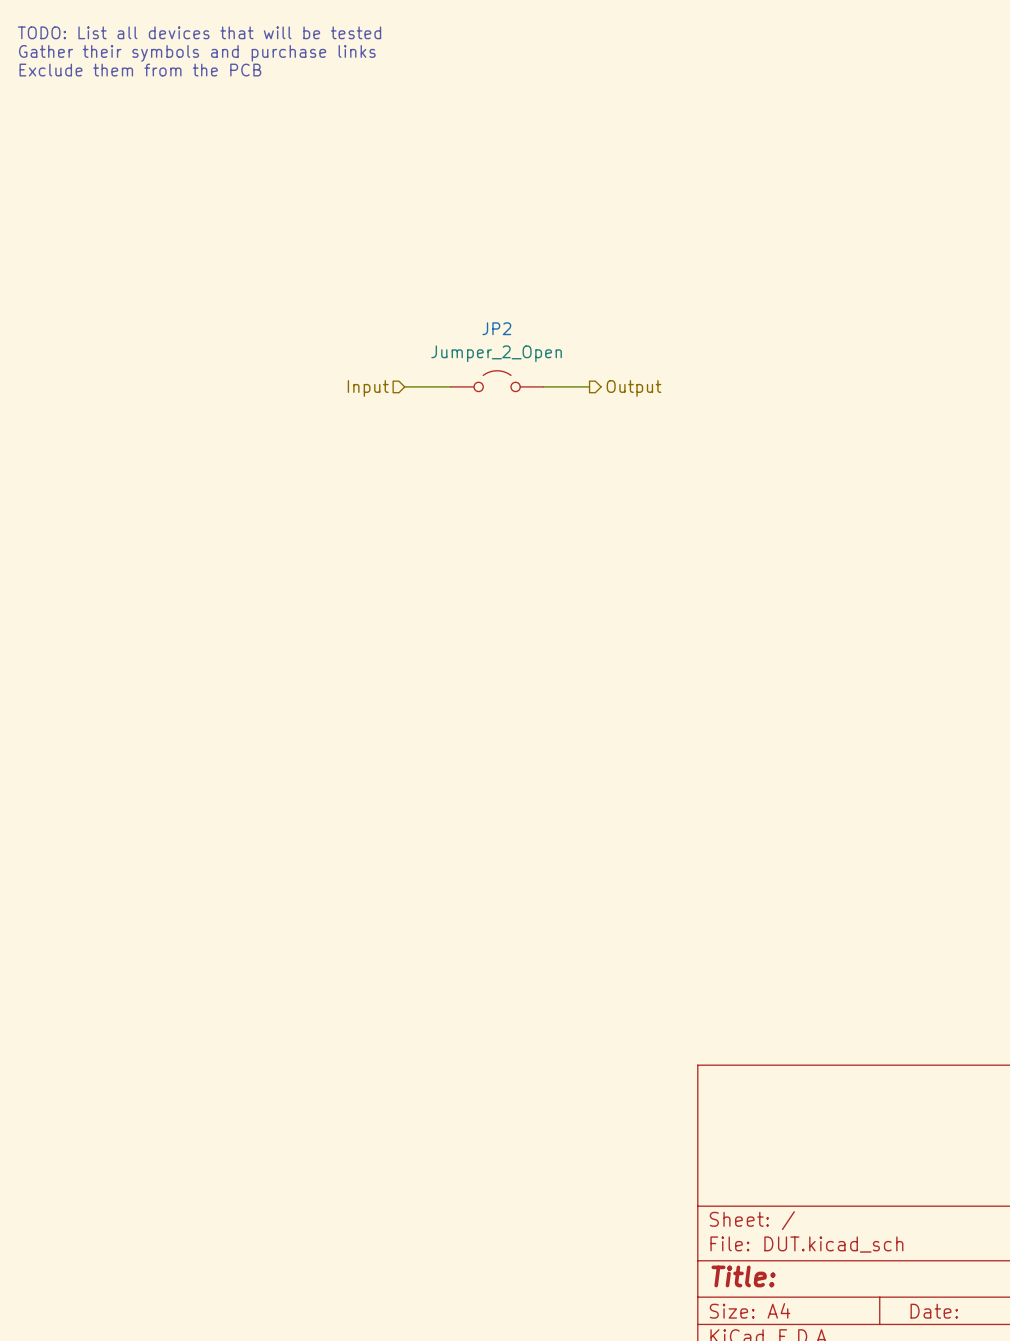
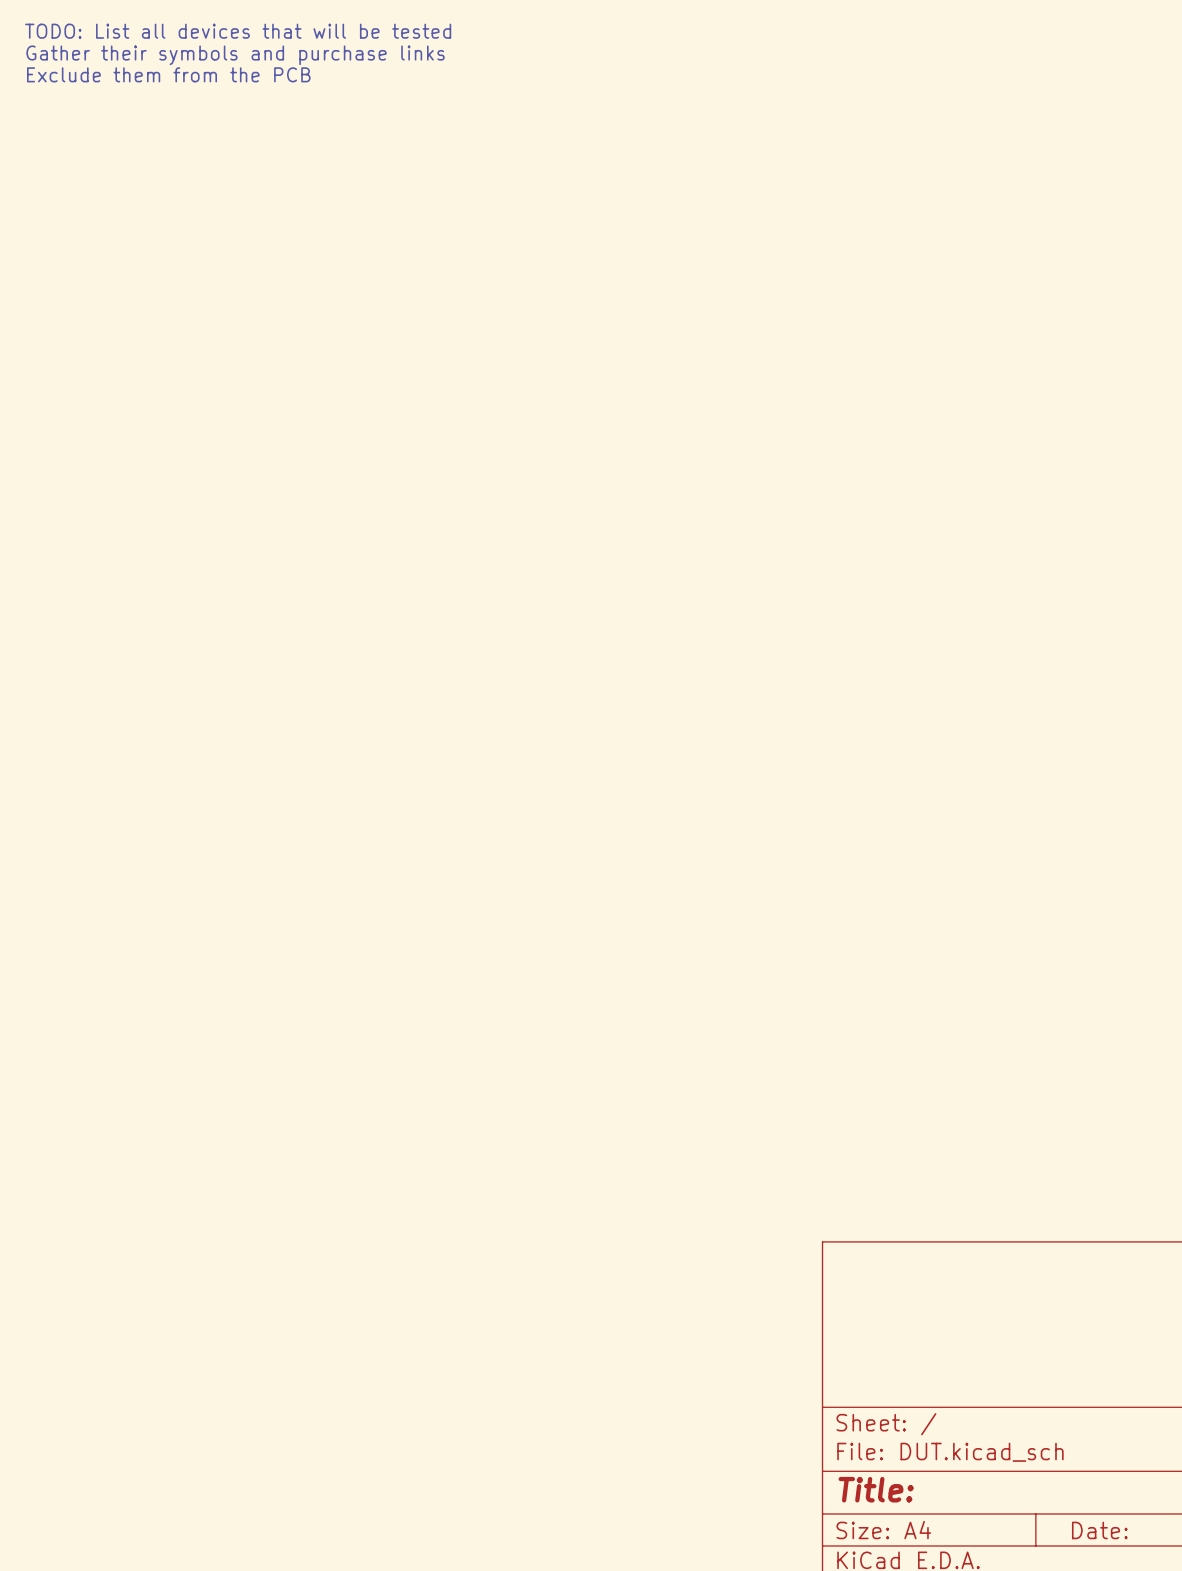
JP2: Jumper_2_Open (497, 381) -> none
wire: (404, 386) (450, 386) -> none
wire: (543, 386) (589, 386) -> none
hierarchical label: Input (368, 388) -> none
hierarchical label: Output (634, 388) -> none

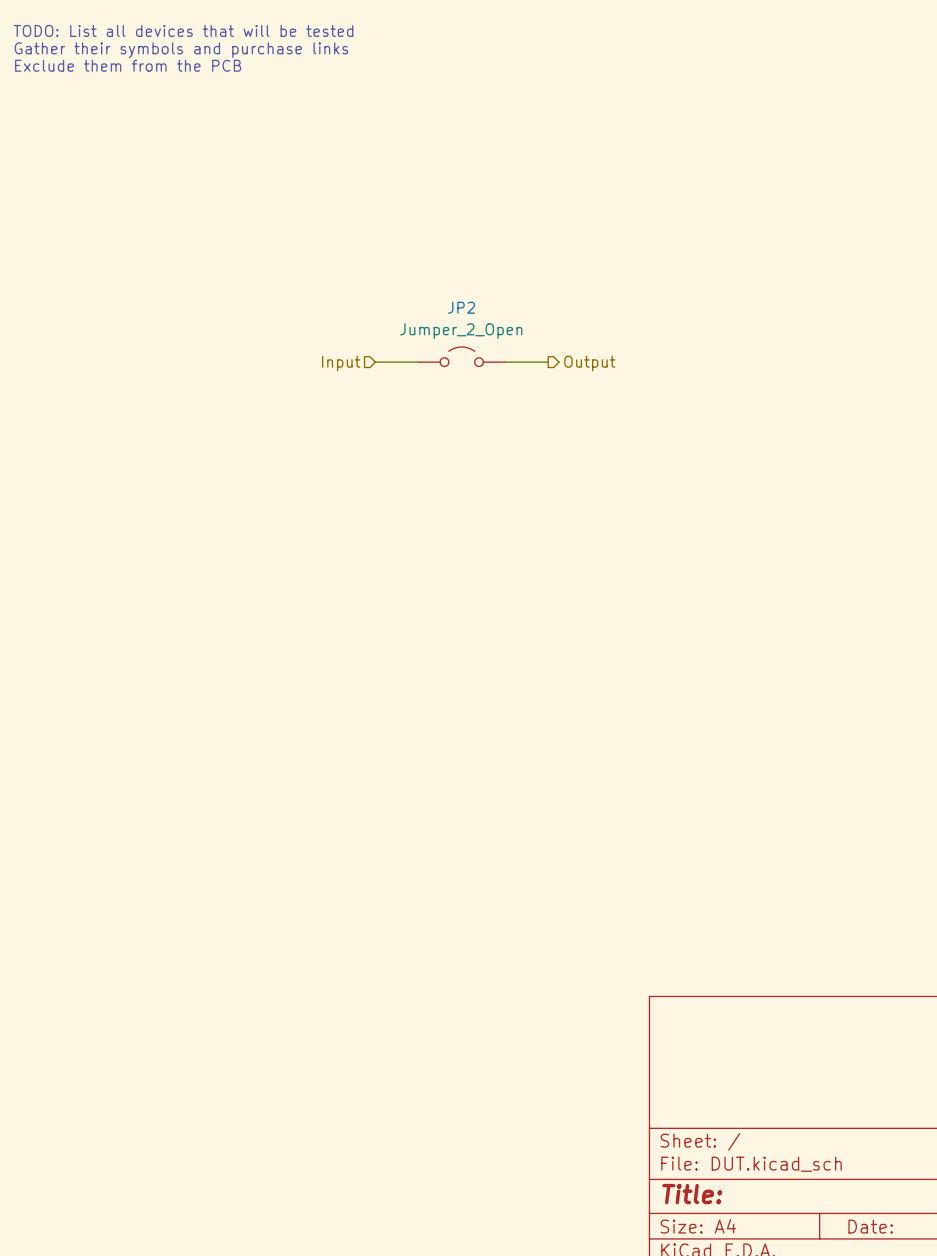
JP2: none -> Jumper_2_Open (461, 356)
wire: none -> (375, 362) (418, 362)
wire: none -> (505, 362) (548, 362)
hierarchical label: none -> Input (341, 363)
hierarchical label: none -> Output (589, 363)

